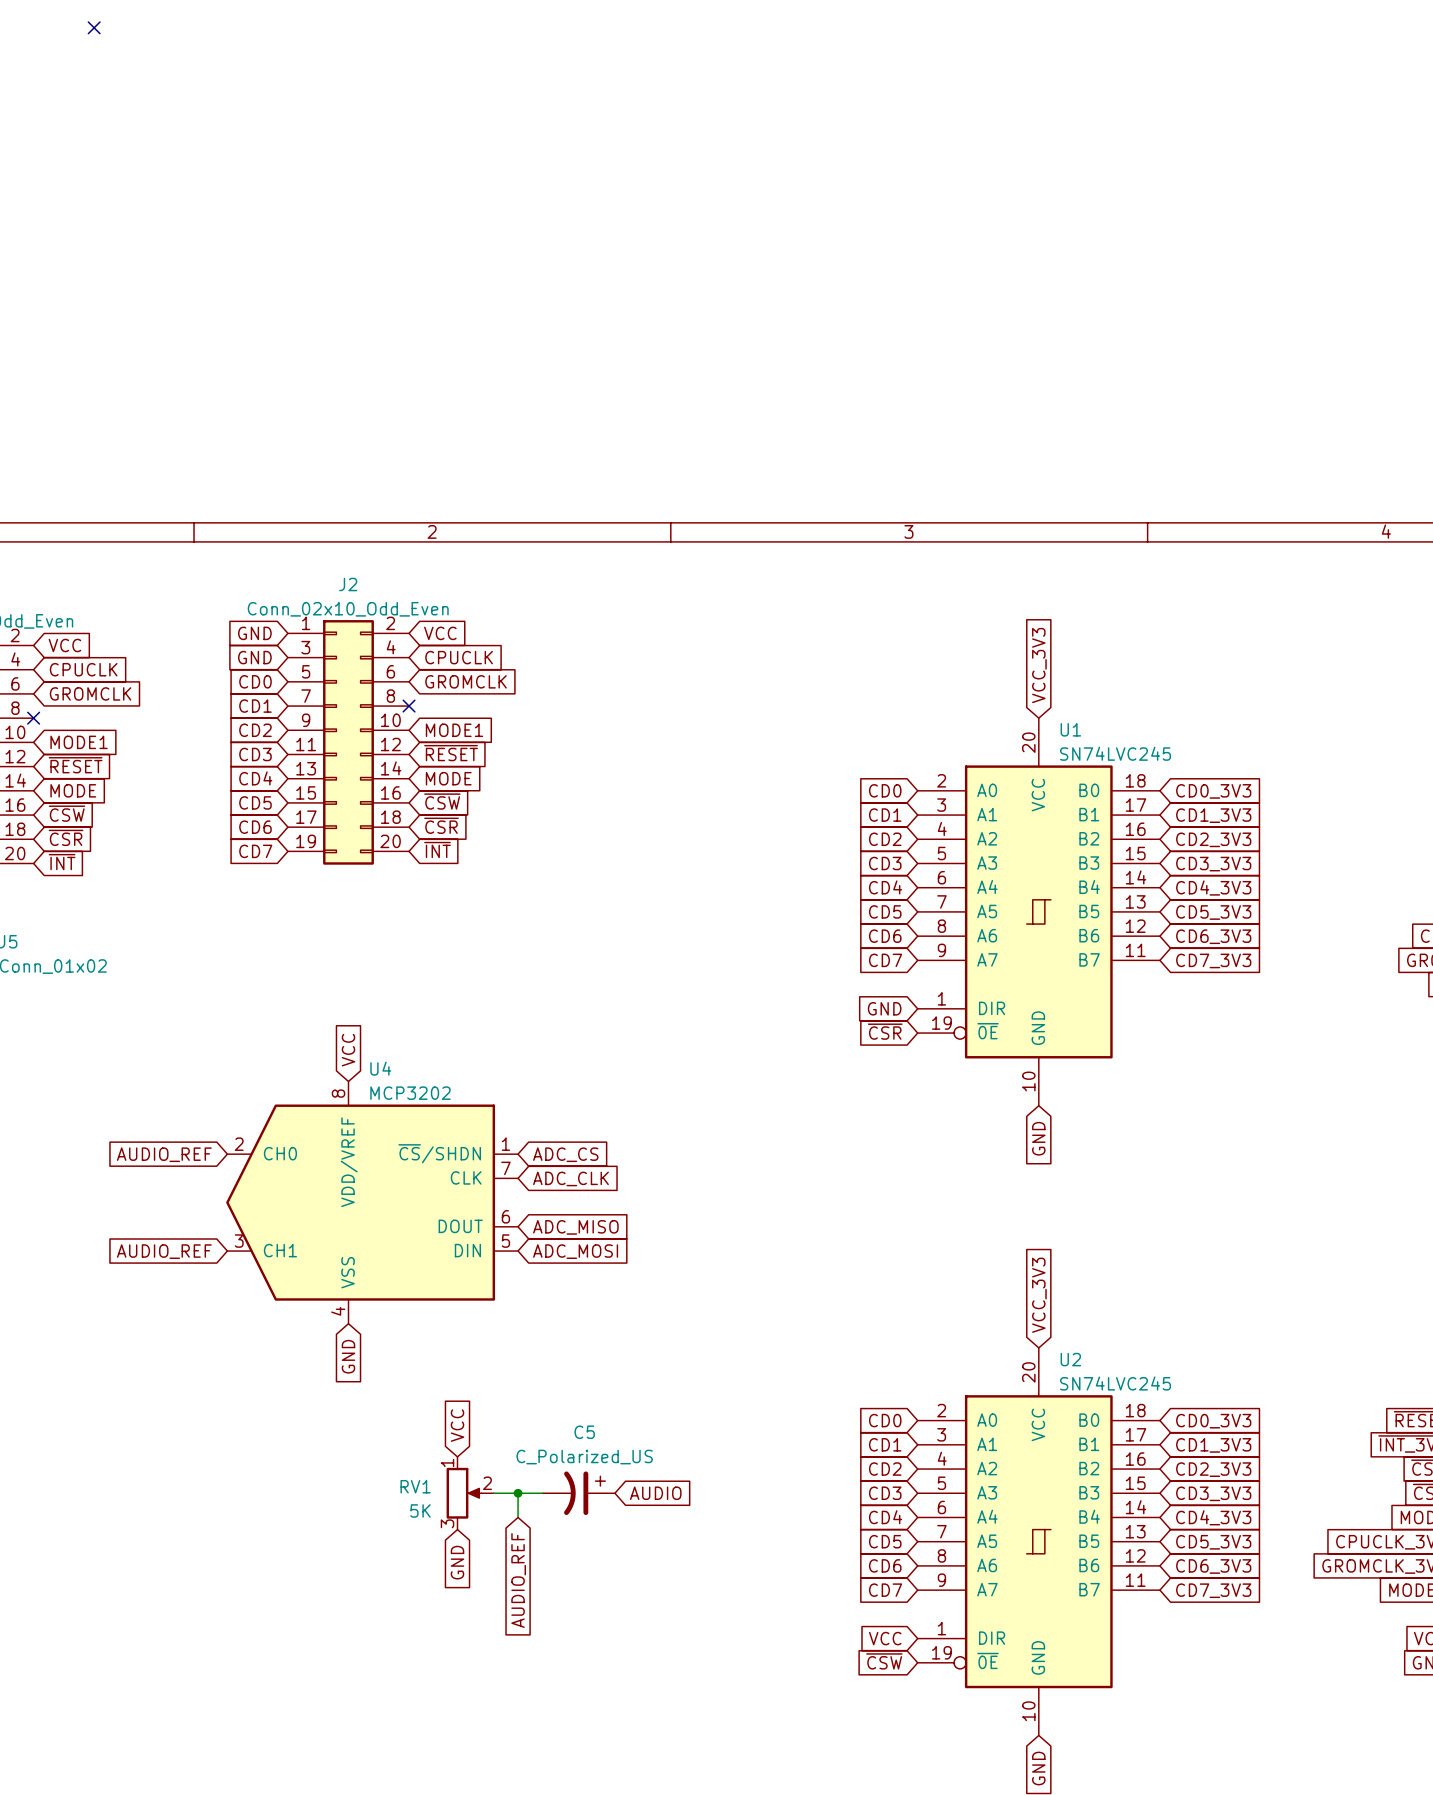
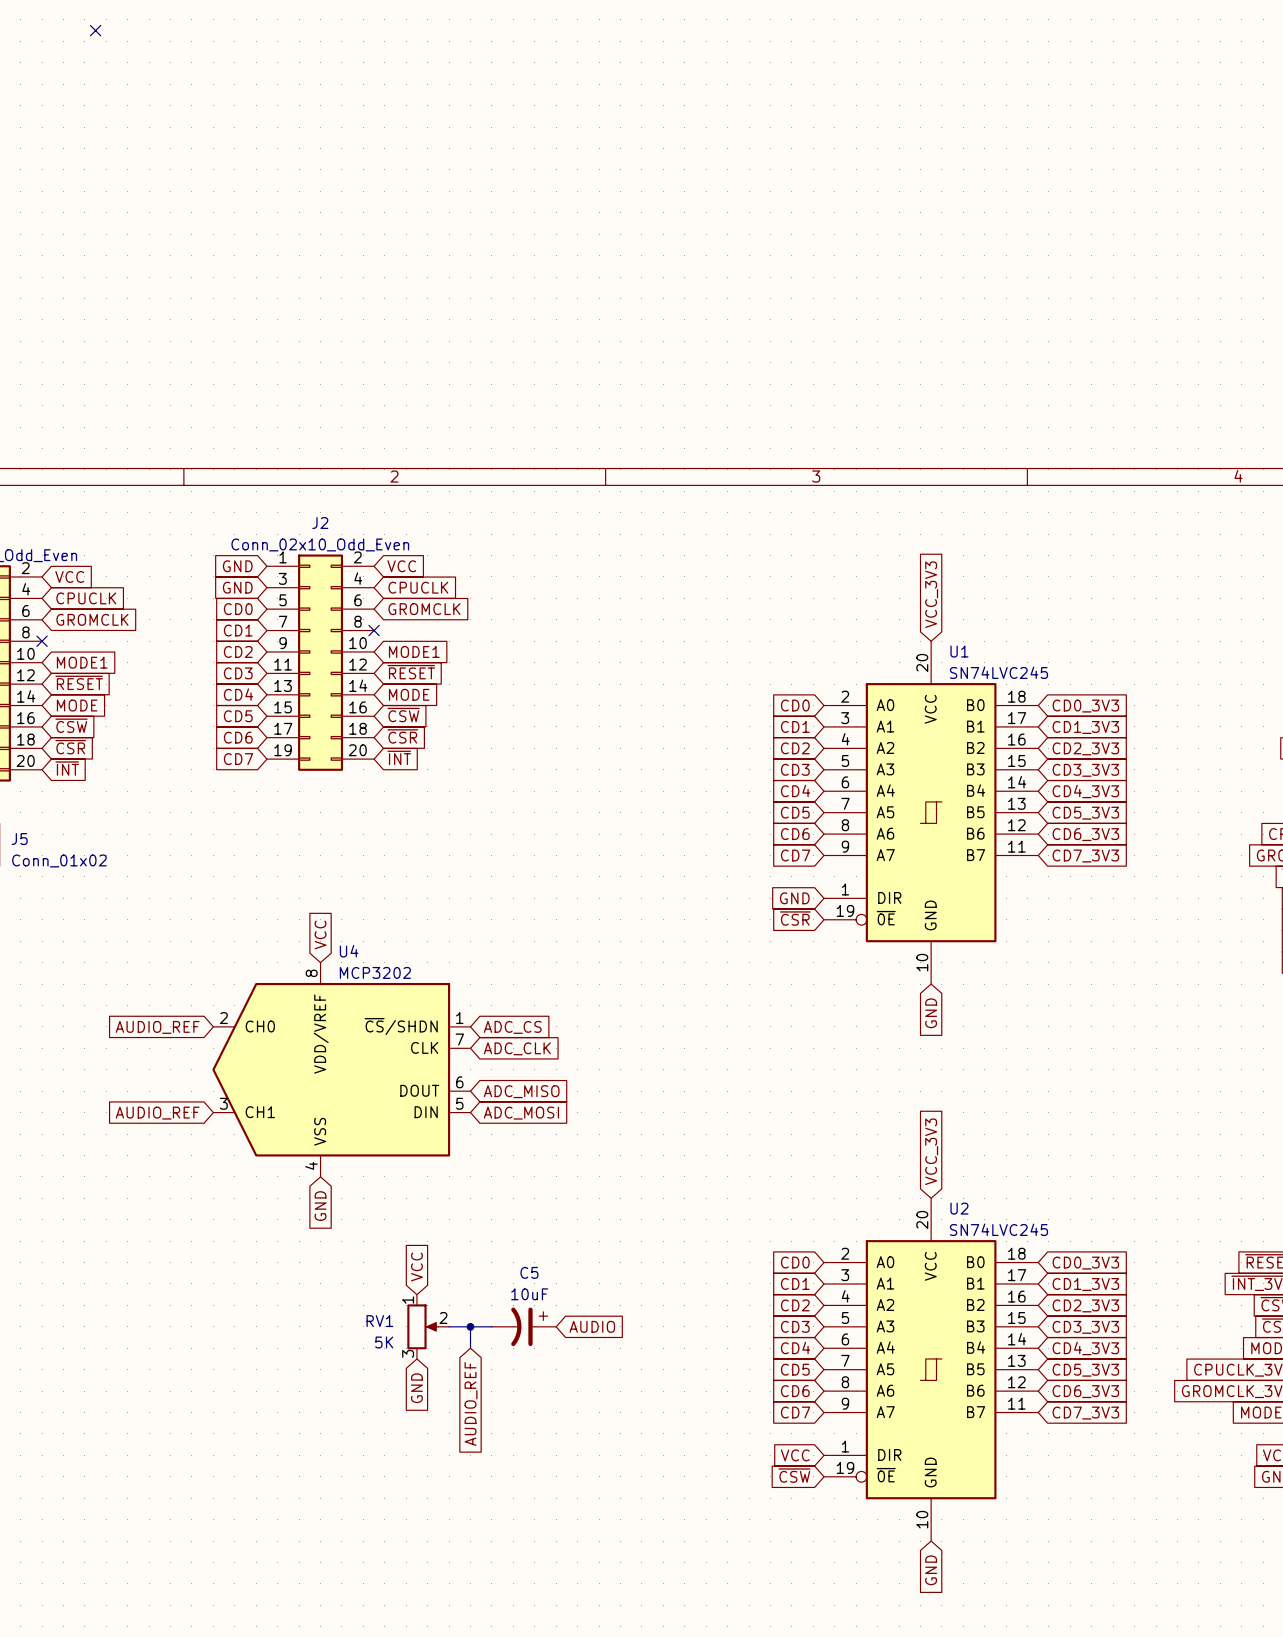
C5 value: C_Polarized_US (584, 1457) -> 10uF (529, 1294)

